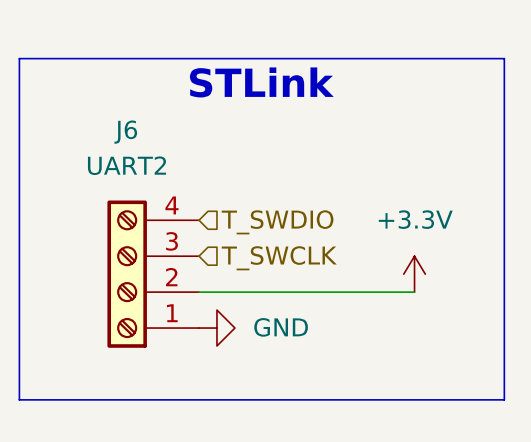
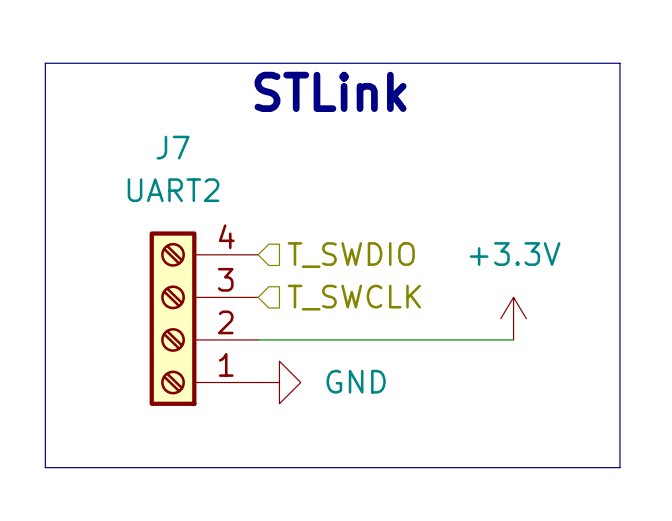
J6 name: J6 (125, 132) -> J7 (173, 147)

